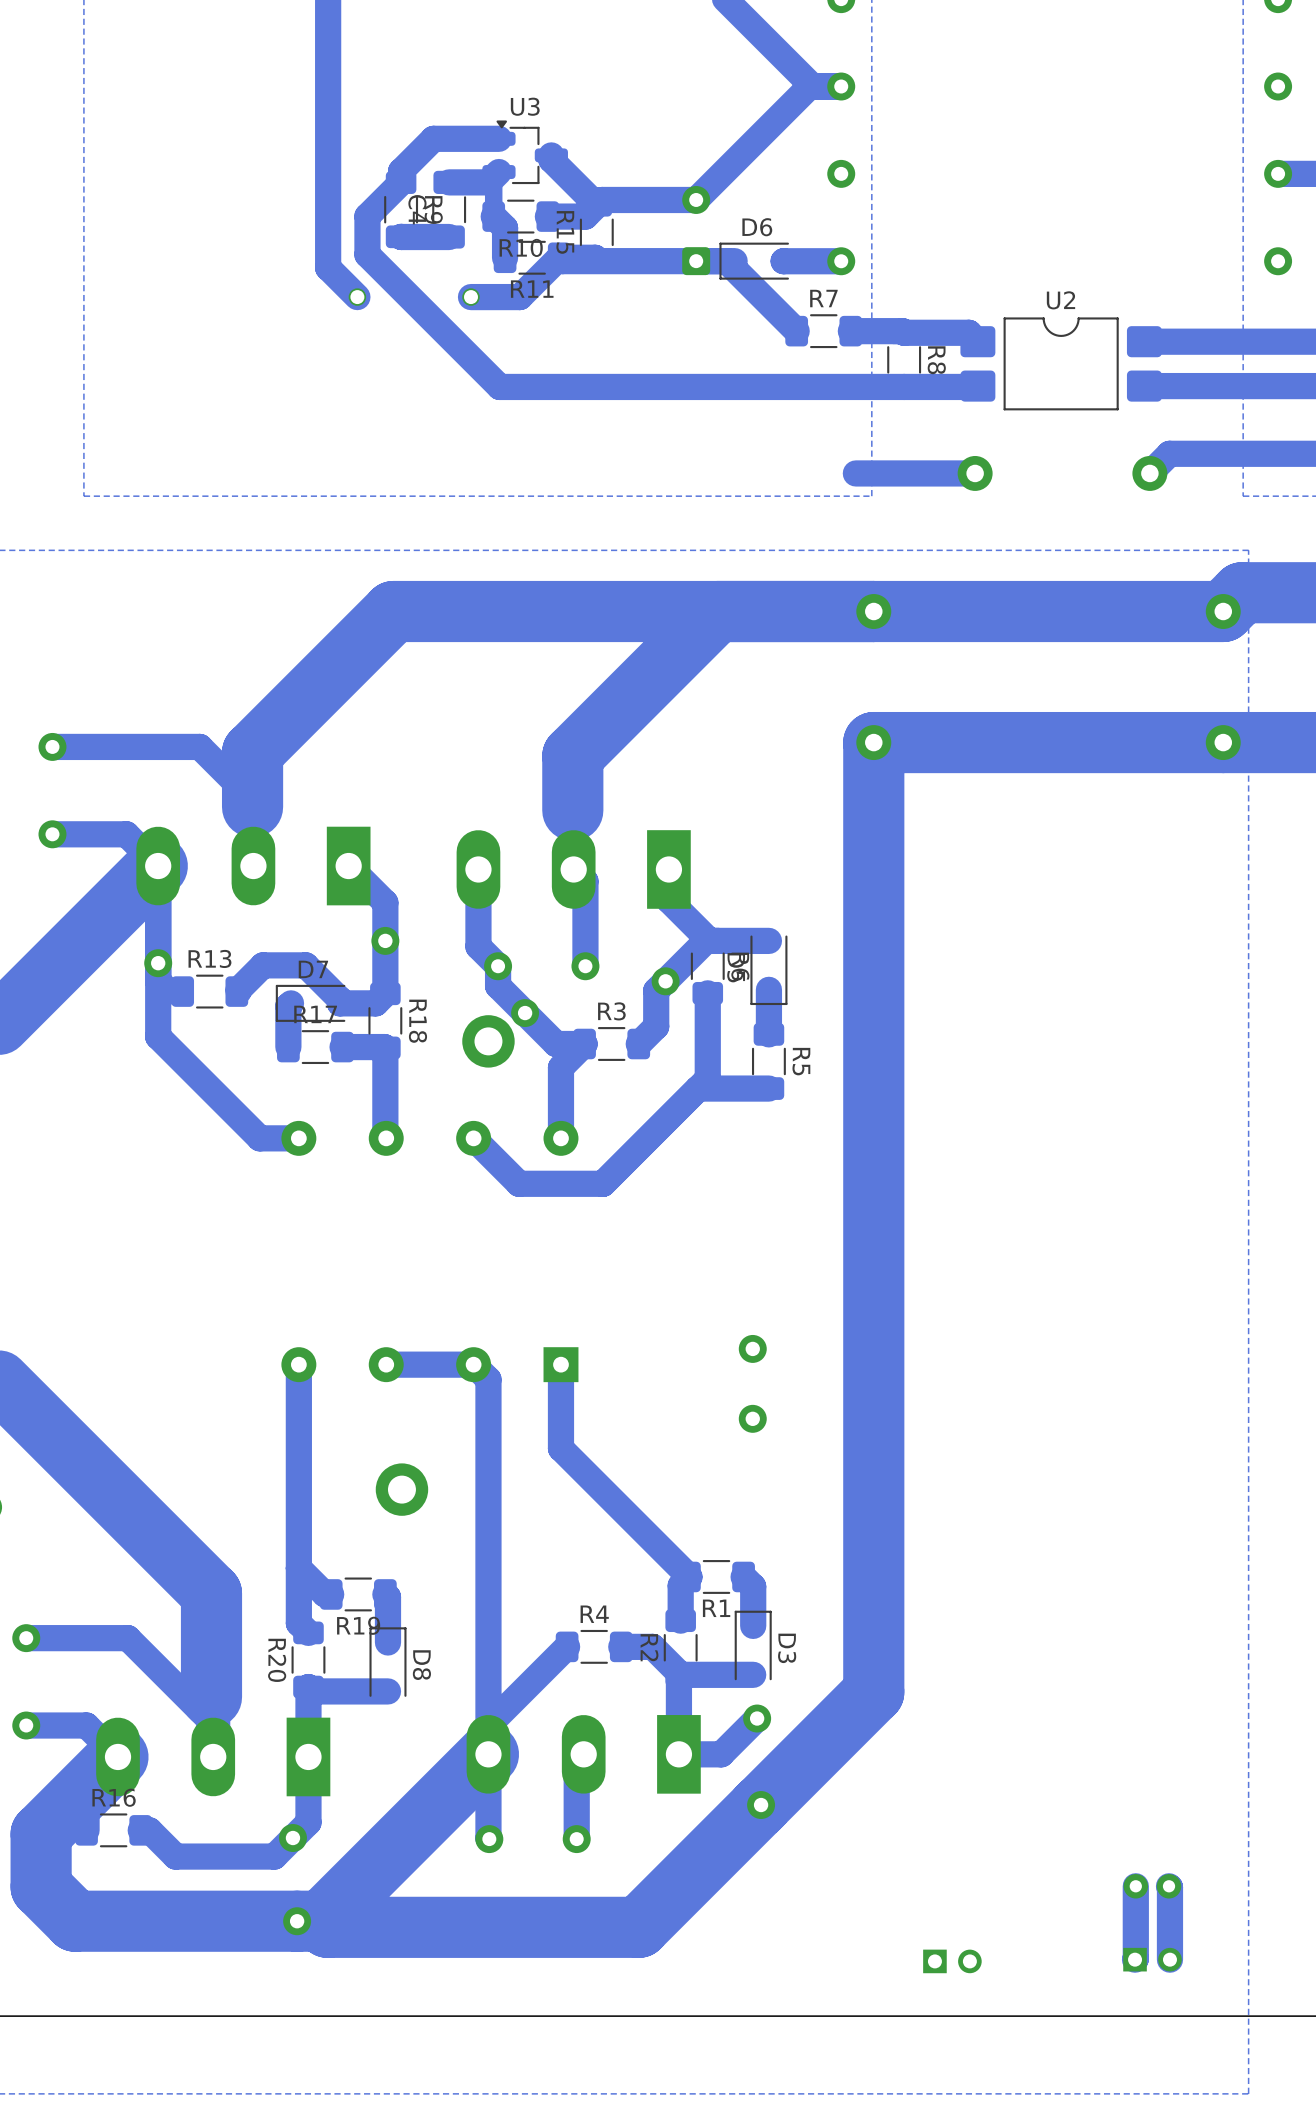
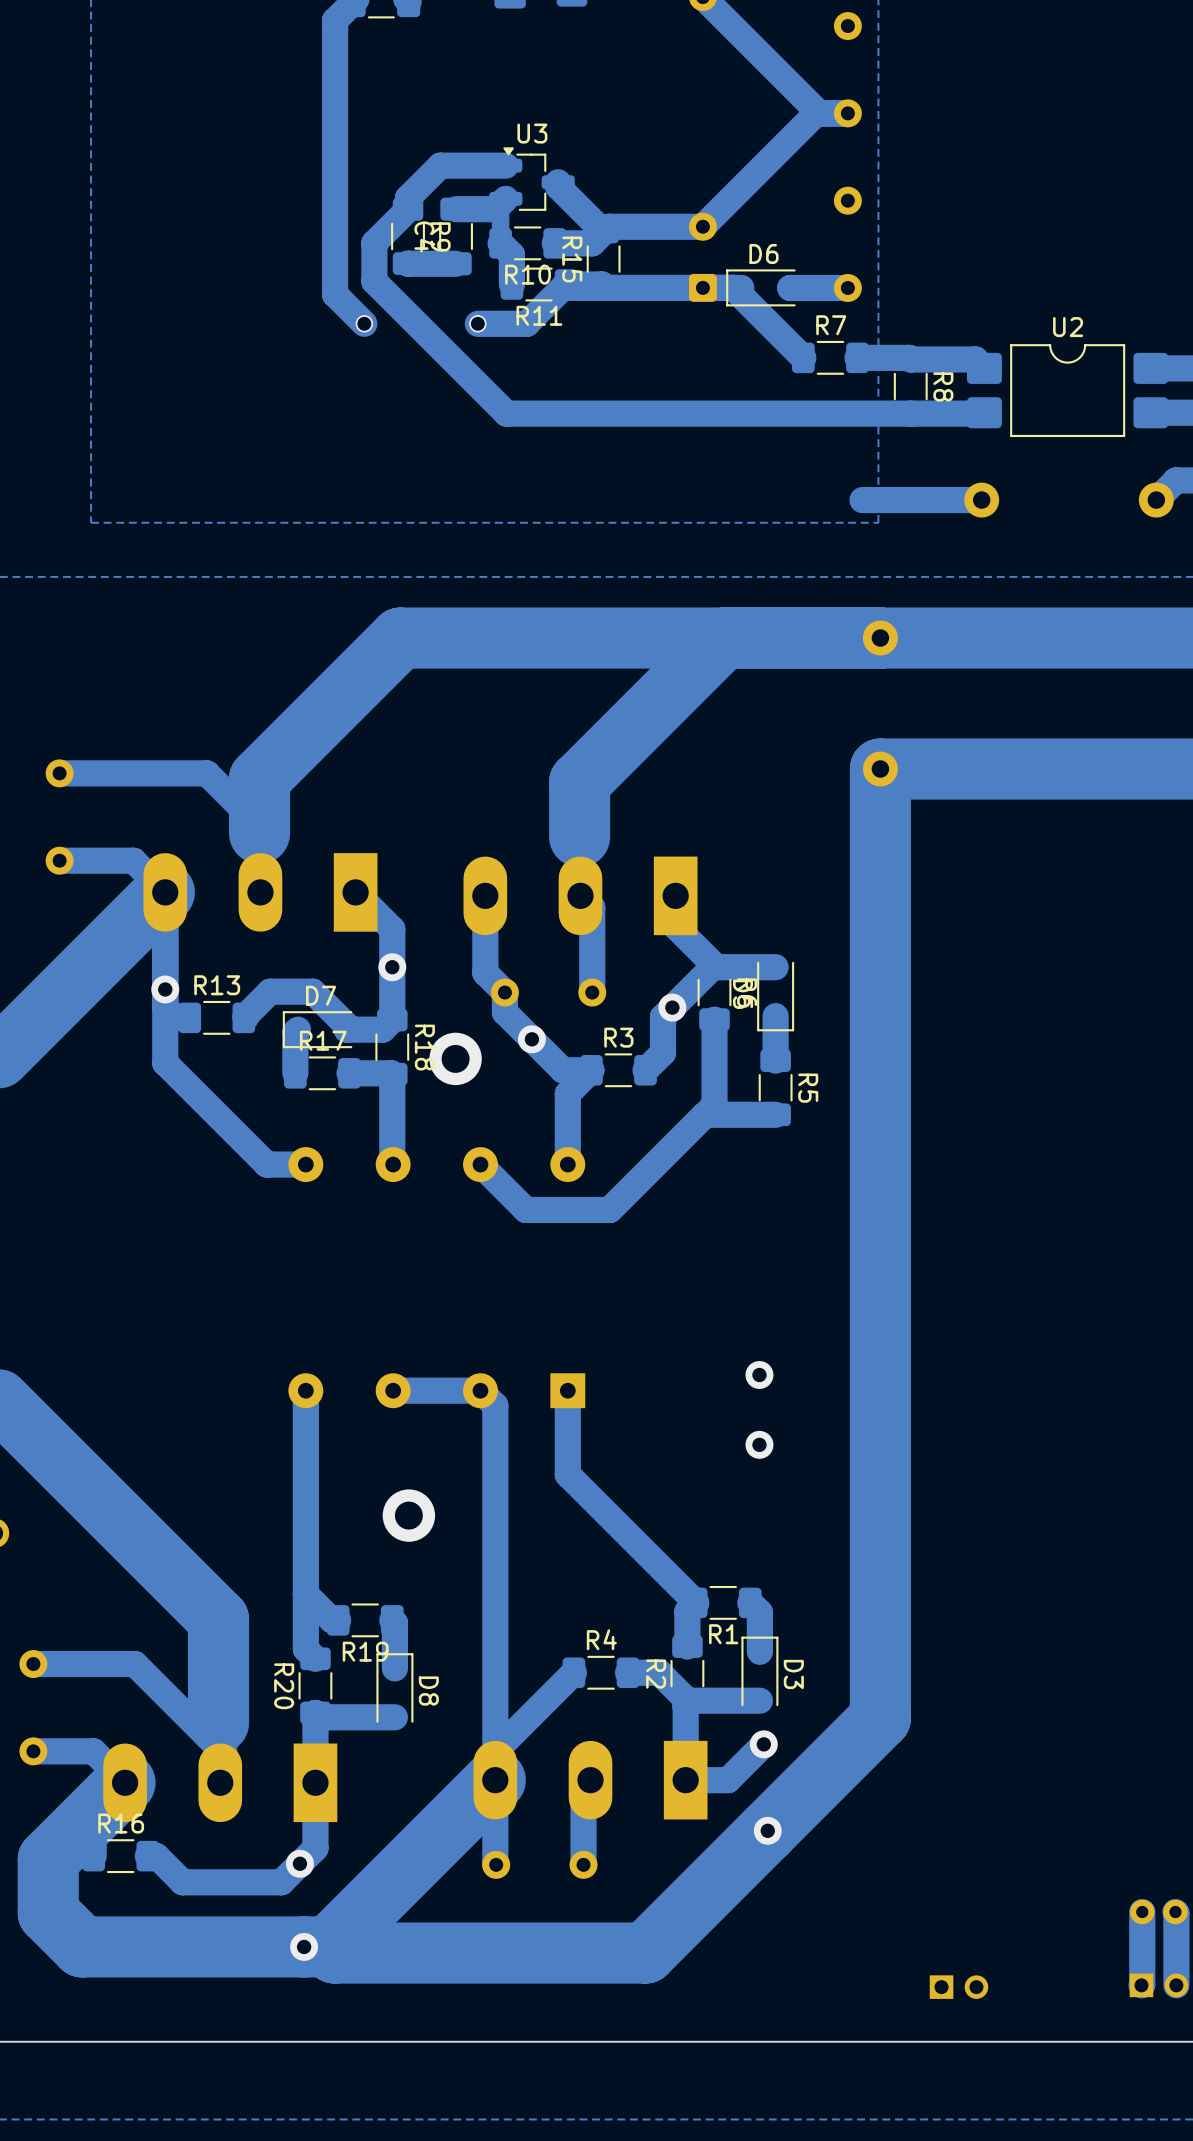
via position: (488, 1041) -> (455, 1058)

